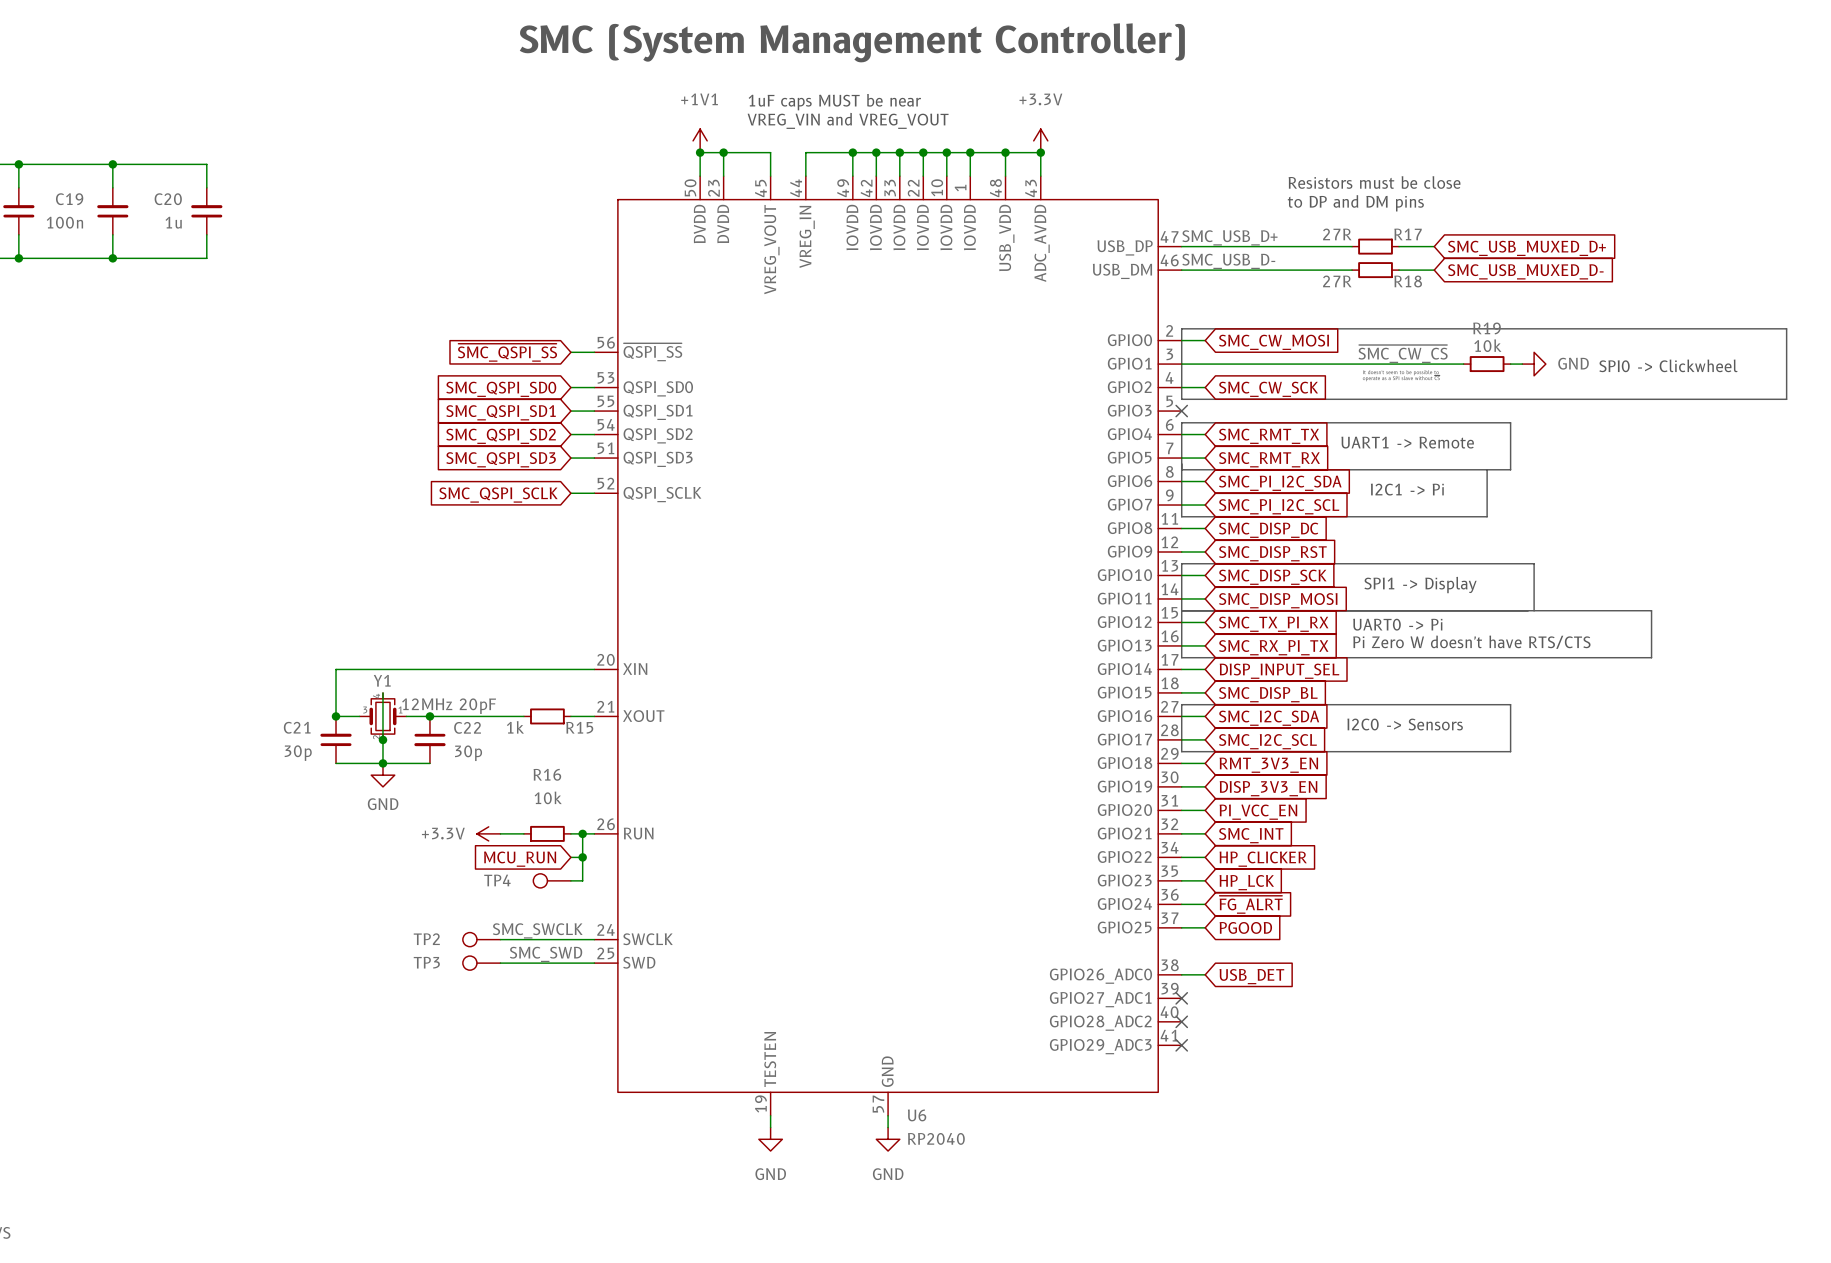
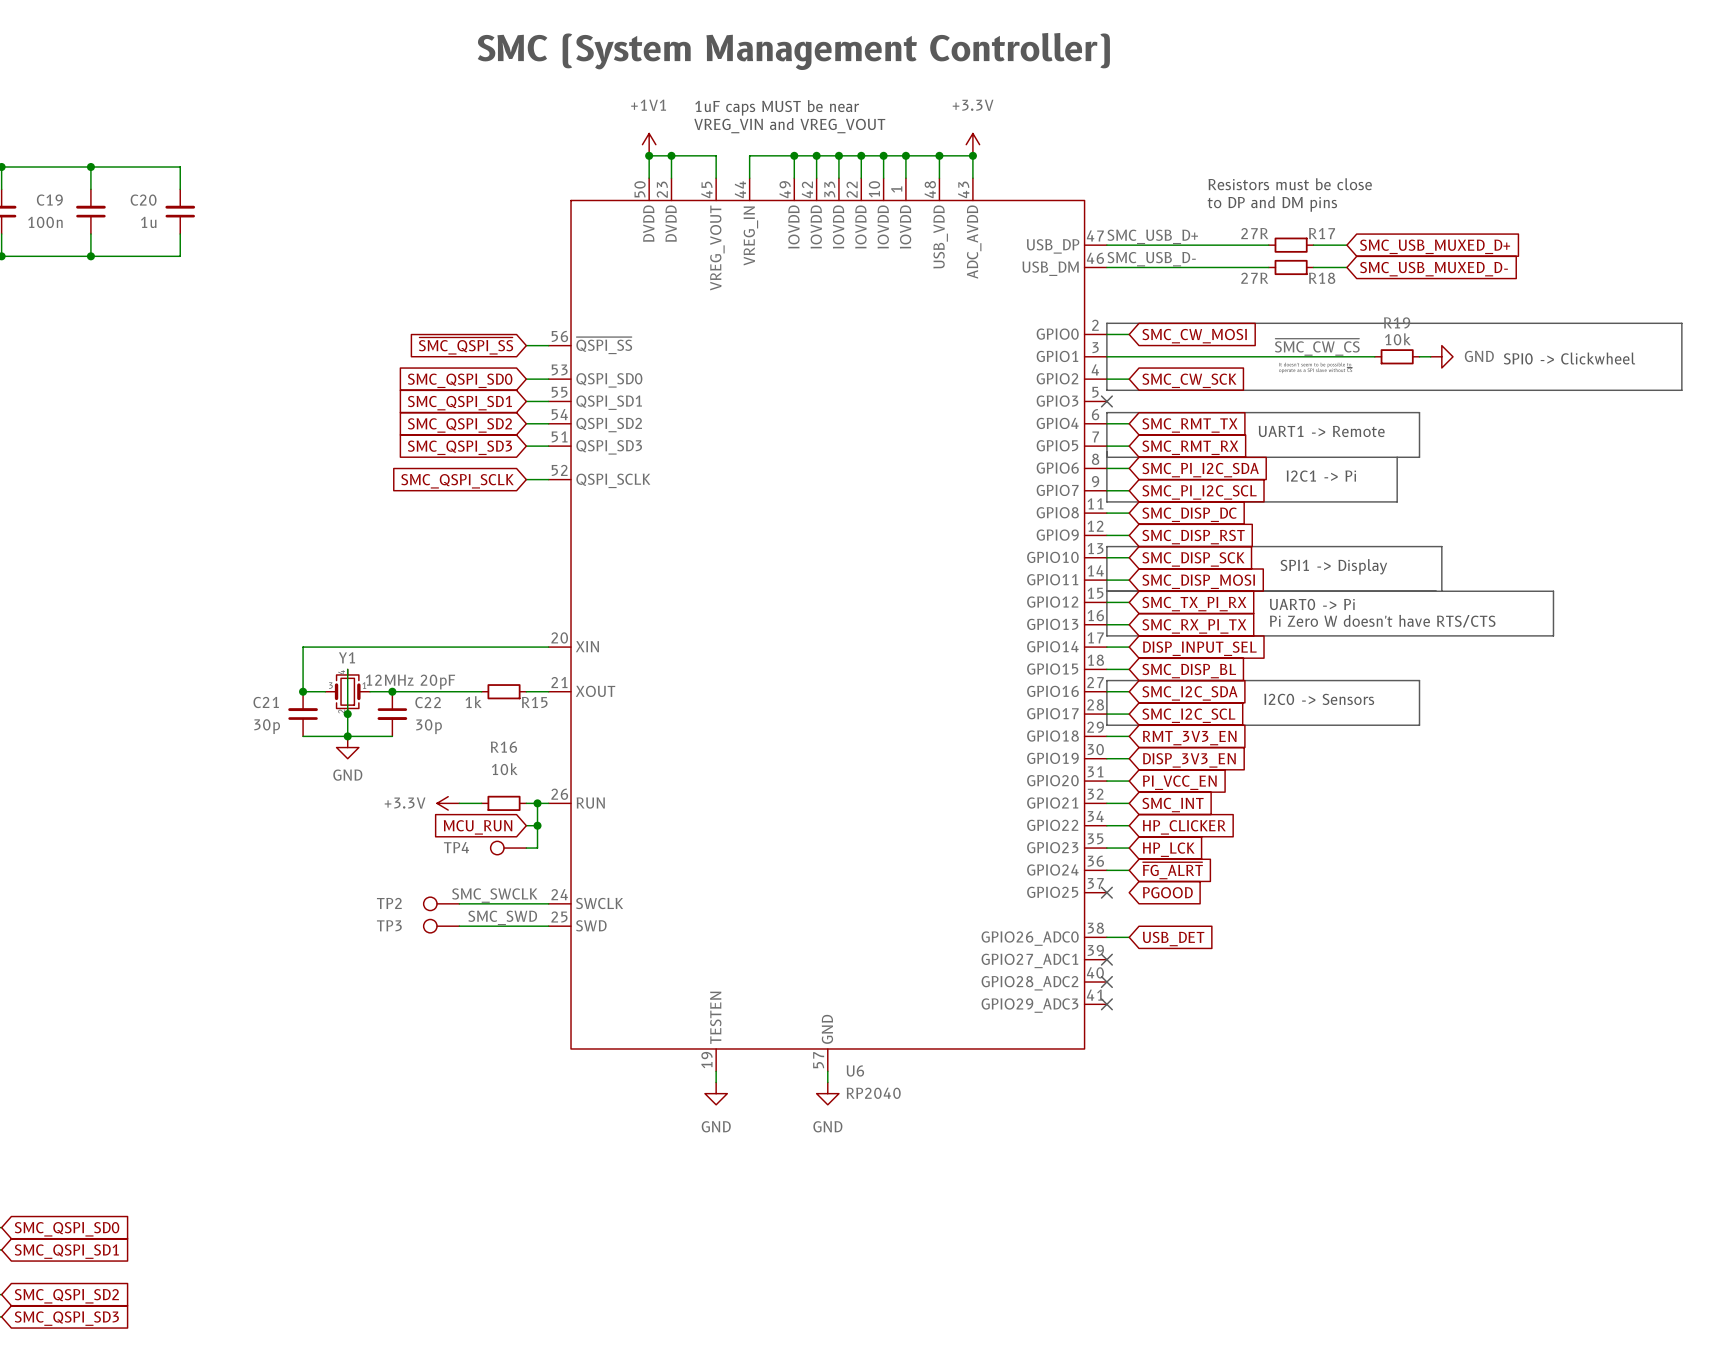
wire: (1181, 927) (1205, 927) -> none
no-connect mark: none -> (1106, 892)

